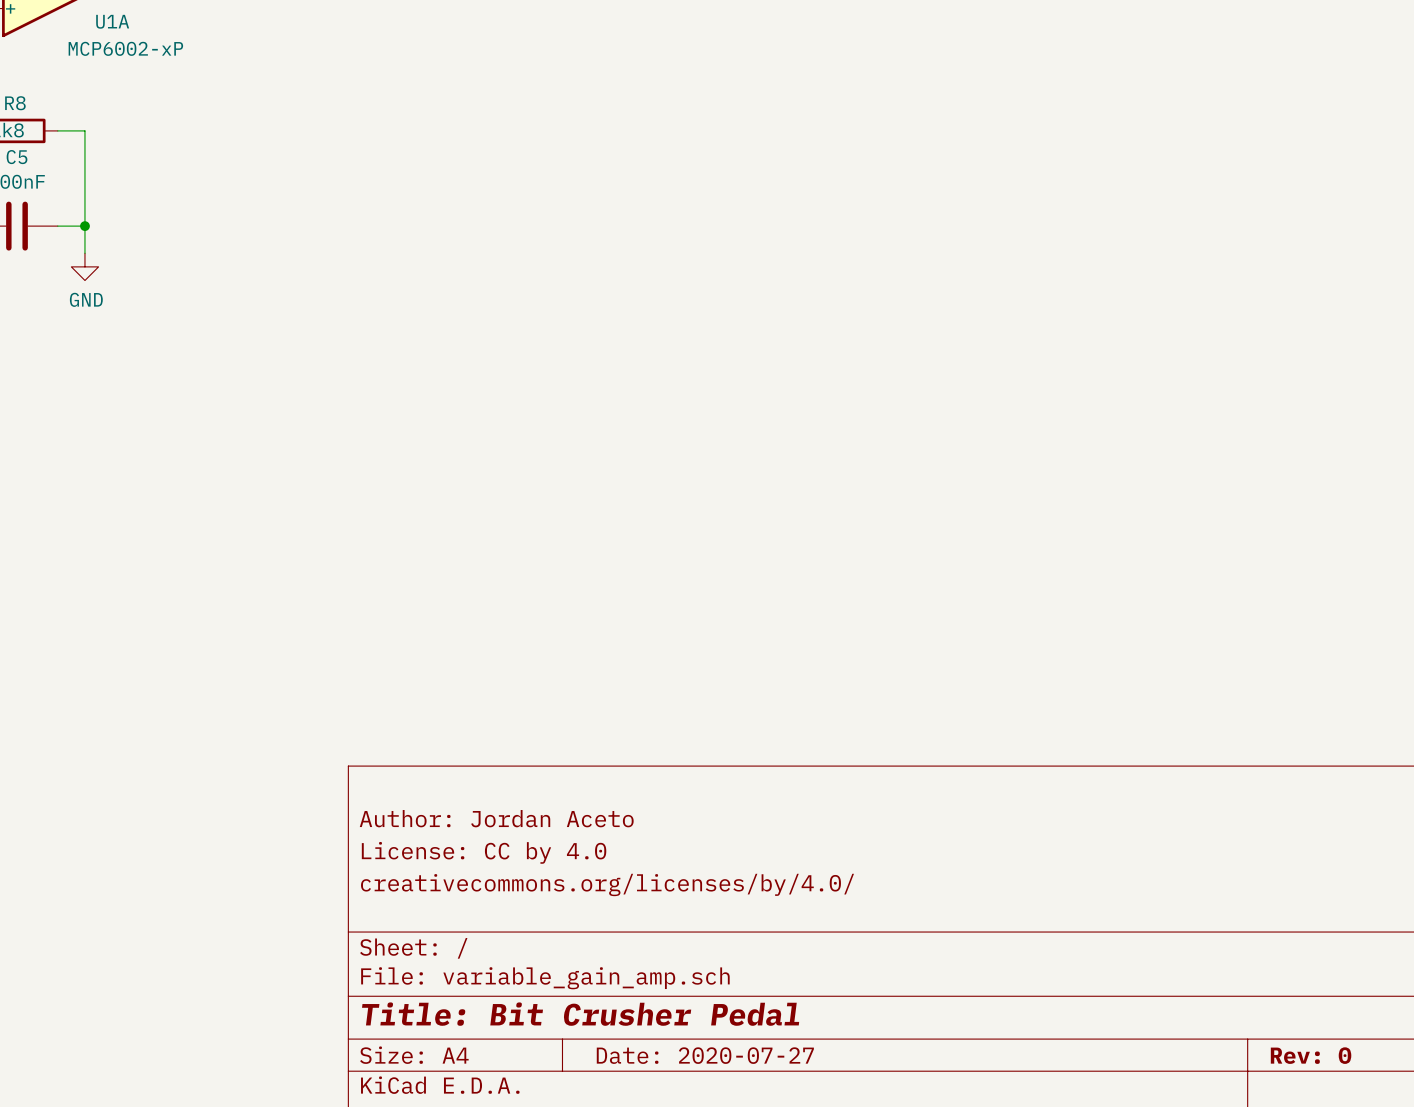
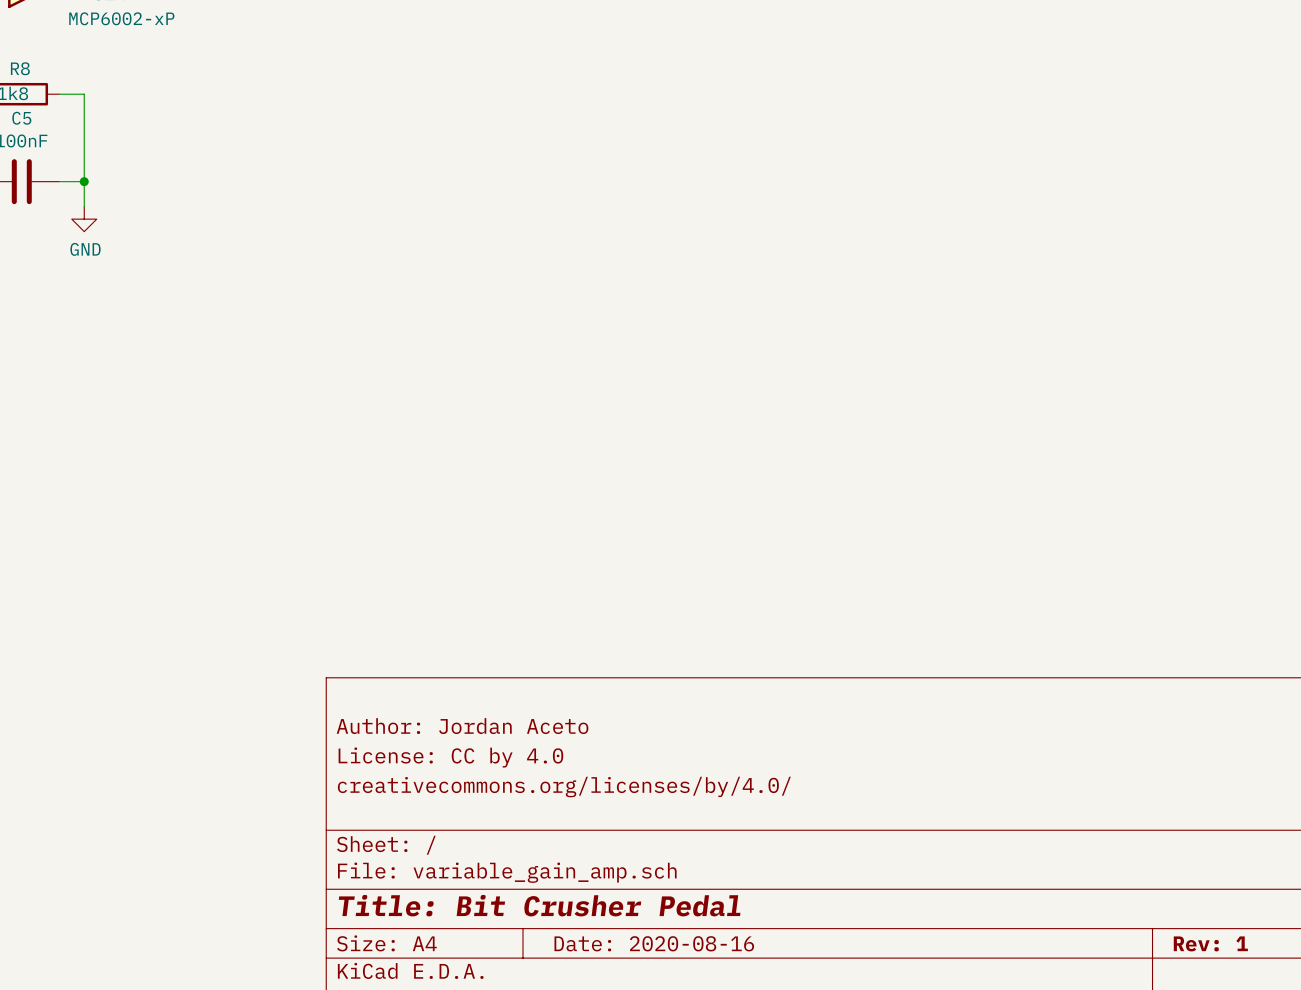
title block: Date: 2020-07-27 (705, 1055) -> Date: 2020-08-16 (654, 943)
title block: Rev: 0 (1311, 1055) -> Rev: 1 (1210, 943)

